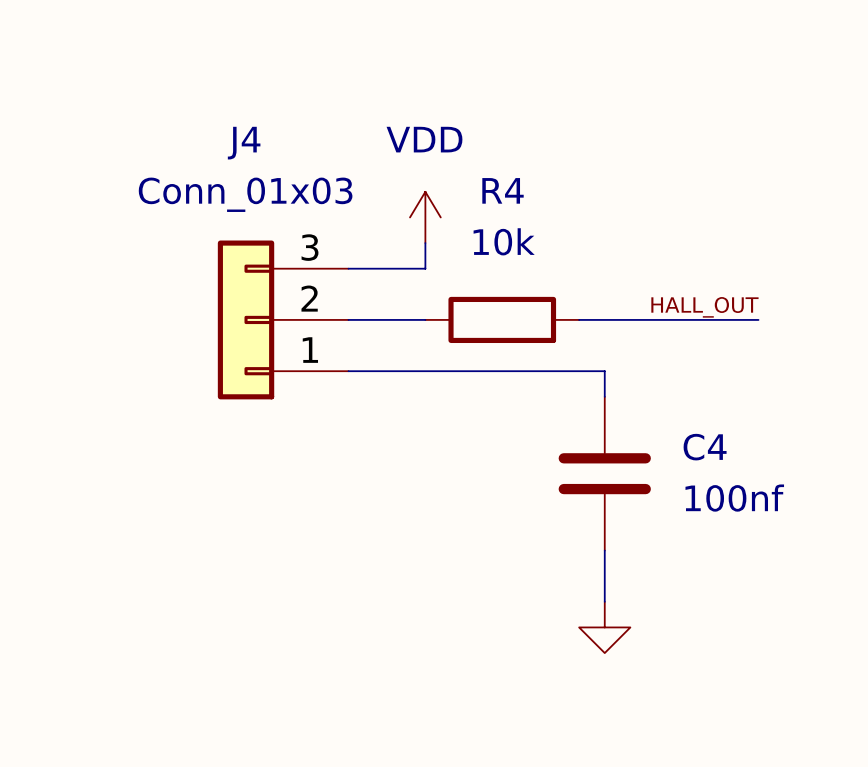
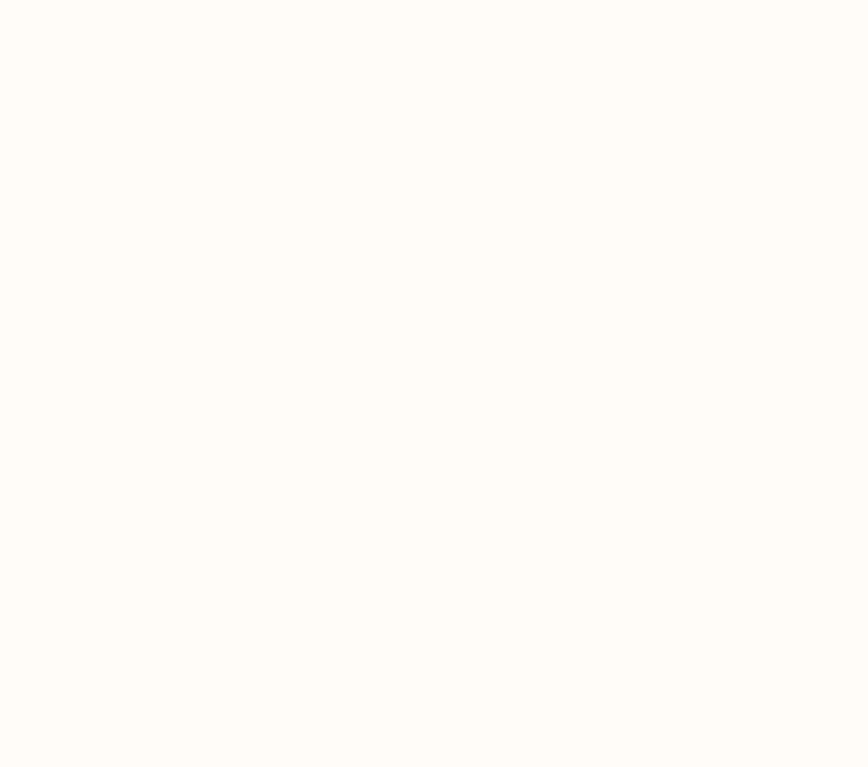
power symbol: VDD (425, 217) -> none
wire: (425, 243) (425, 268) (348, 268) -> none
label: HALL_OUT (704, 307) -> none
J4: Conn_01x03 (283, 319) -> none
wire: (348, 319) (425, 319) -> none
R4: 10k (502, 319) -> none
wire: (579, 319) (758, 319) -> none
wire: (348, 371) (604, 371) (604, 396) -> none
C4: 100nf (604, 473) -> none
wire: (604, 550) (604, 601) -> none
power symbol: (604, 627) -> none

